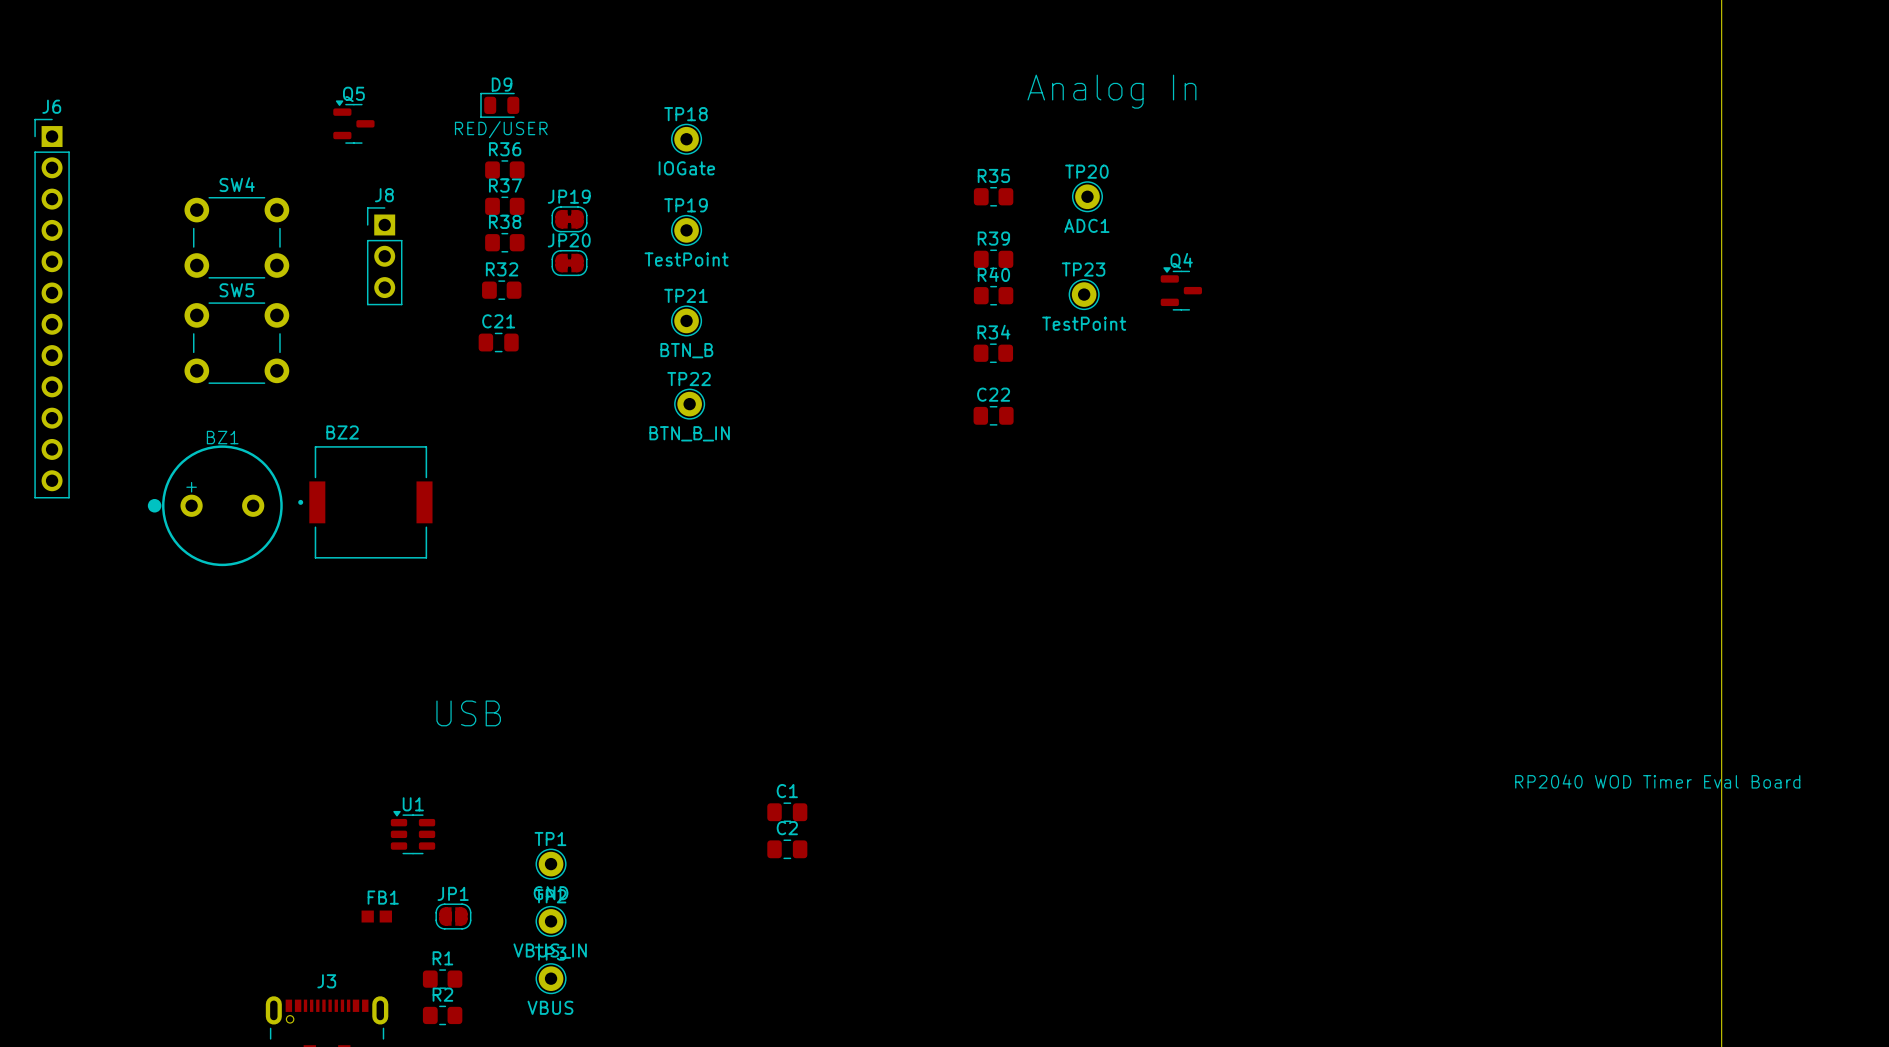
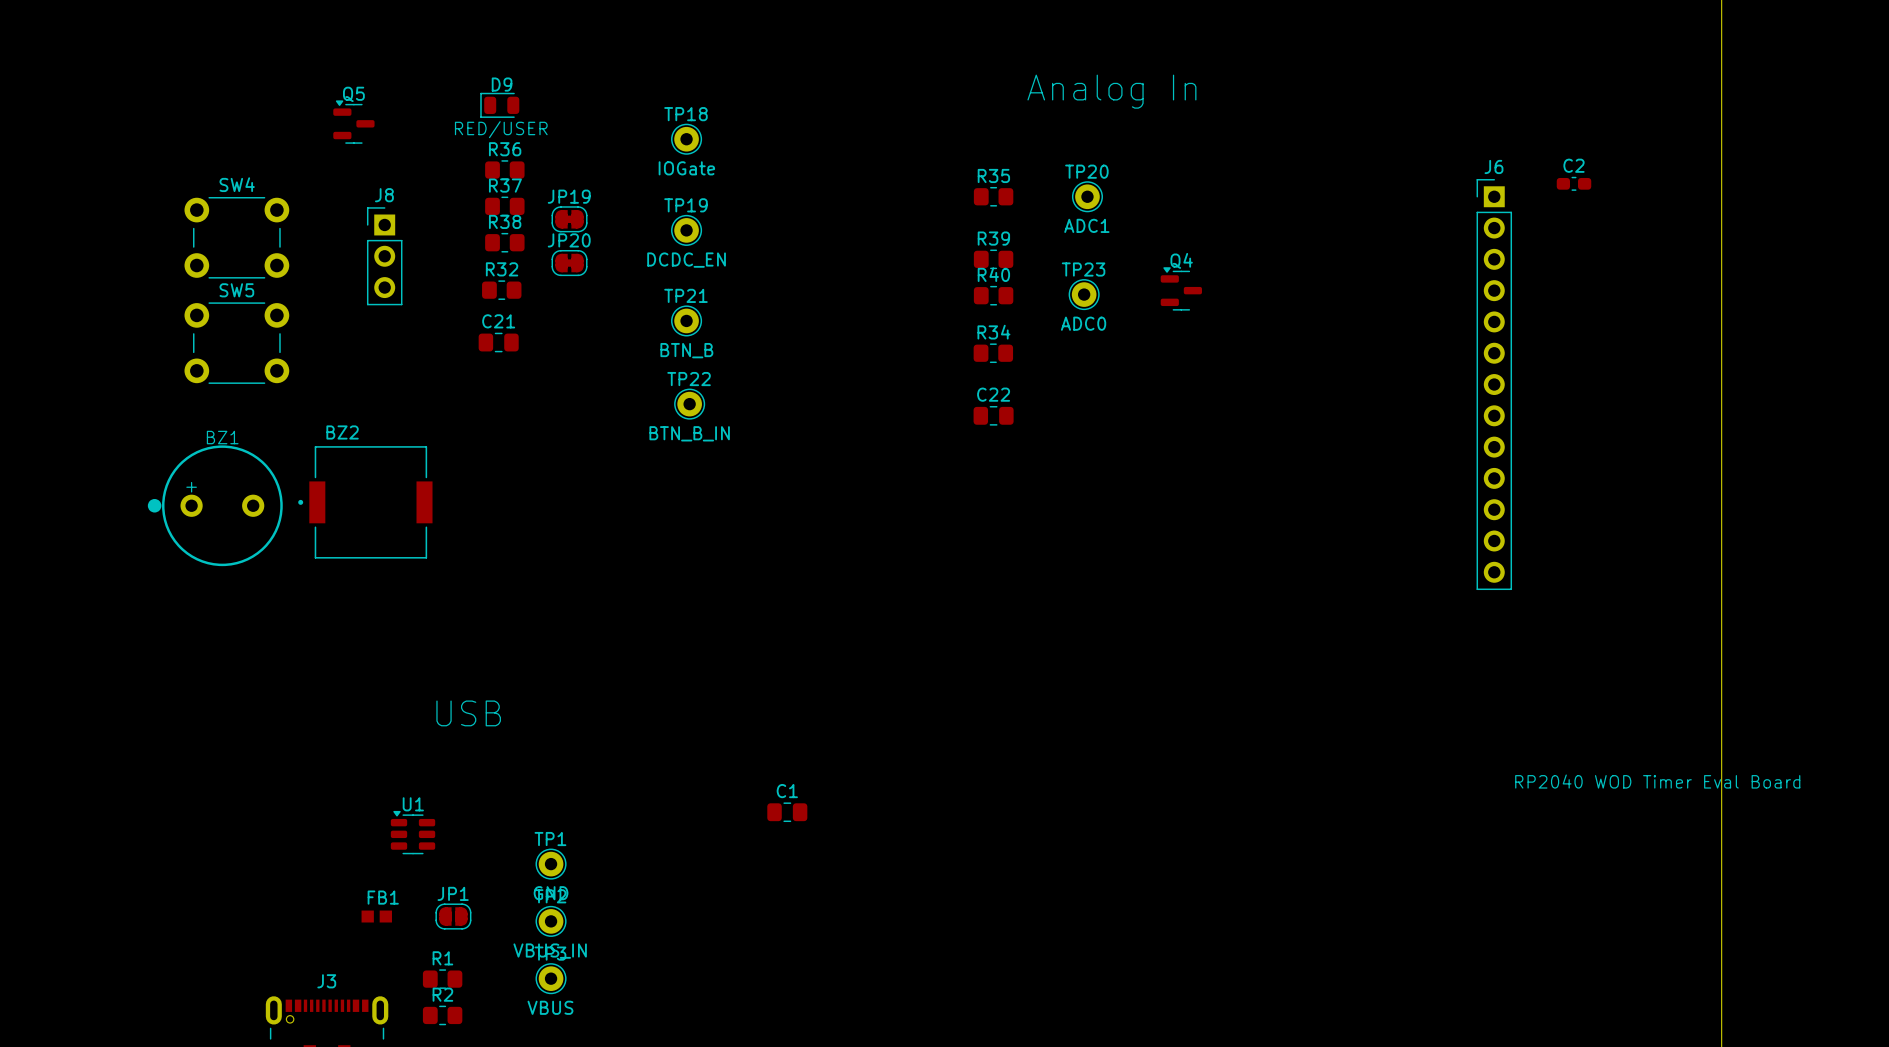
J6 footprint: [34, 118, 70, 499] -> [1476, 179, 1513, 591]
TP19 text: TestPoint (686, 259) -> DCDC_EN (686, 260)
TP23 text: TestPoint (1084, 323) -> ADC0 (1083, 323)
C2 footprint: [767, 839, 808, 860] -> [1556, 176, 1592, 191]

